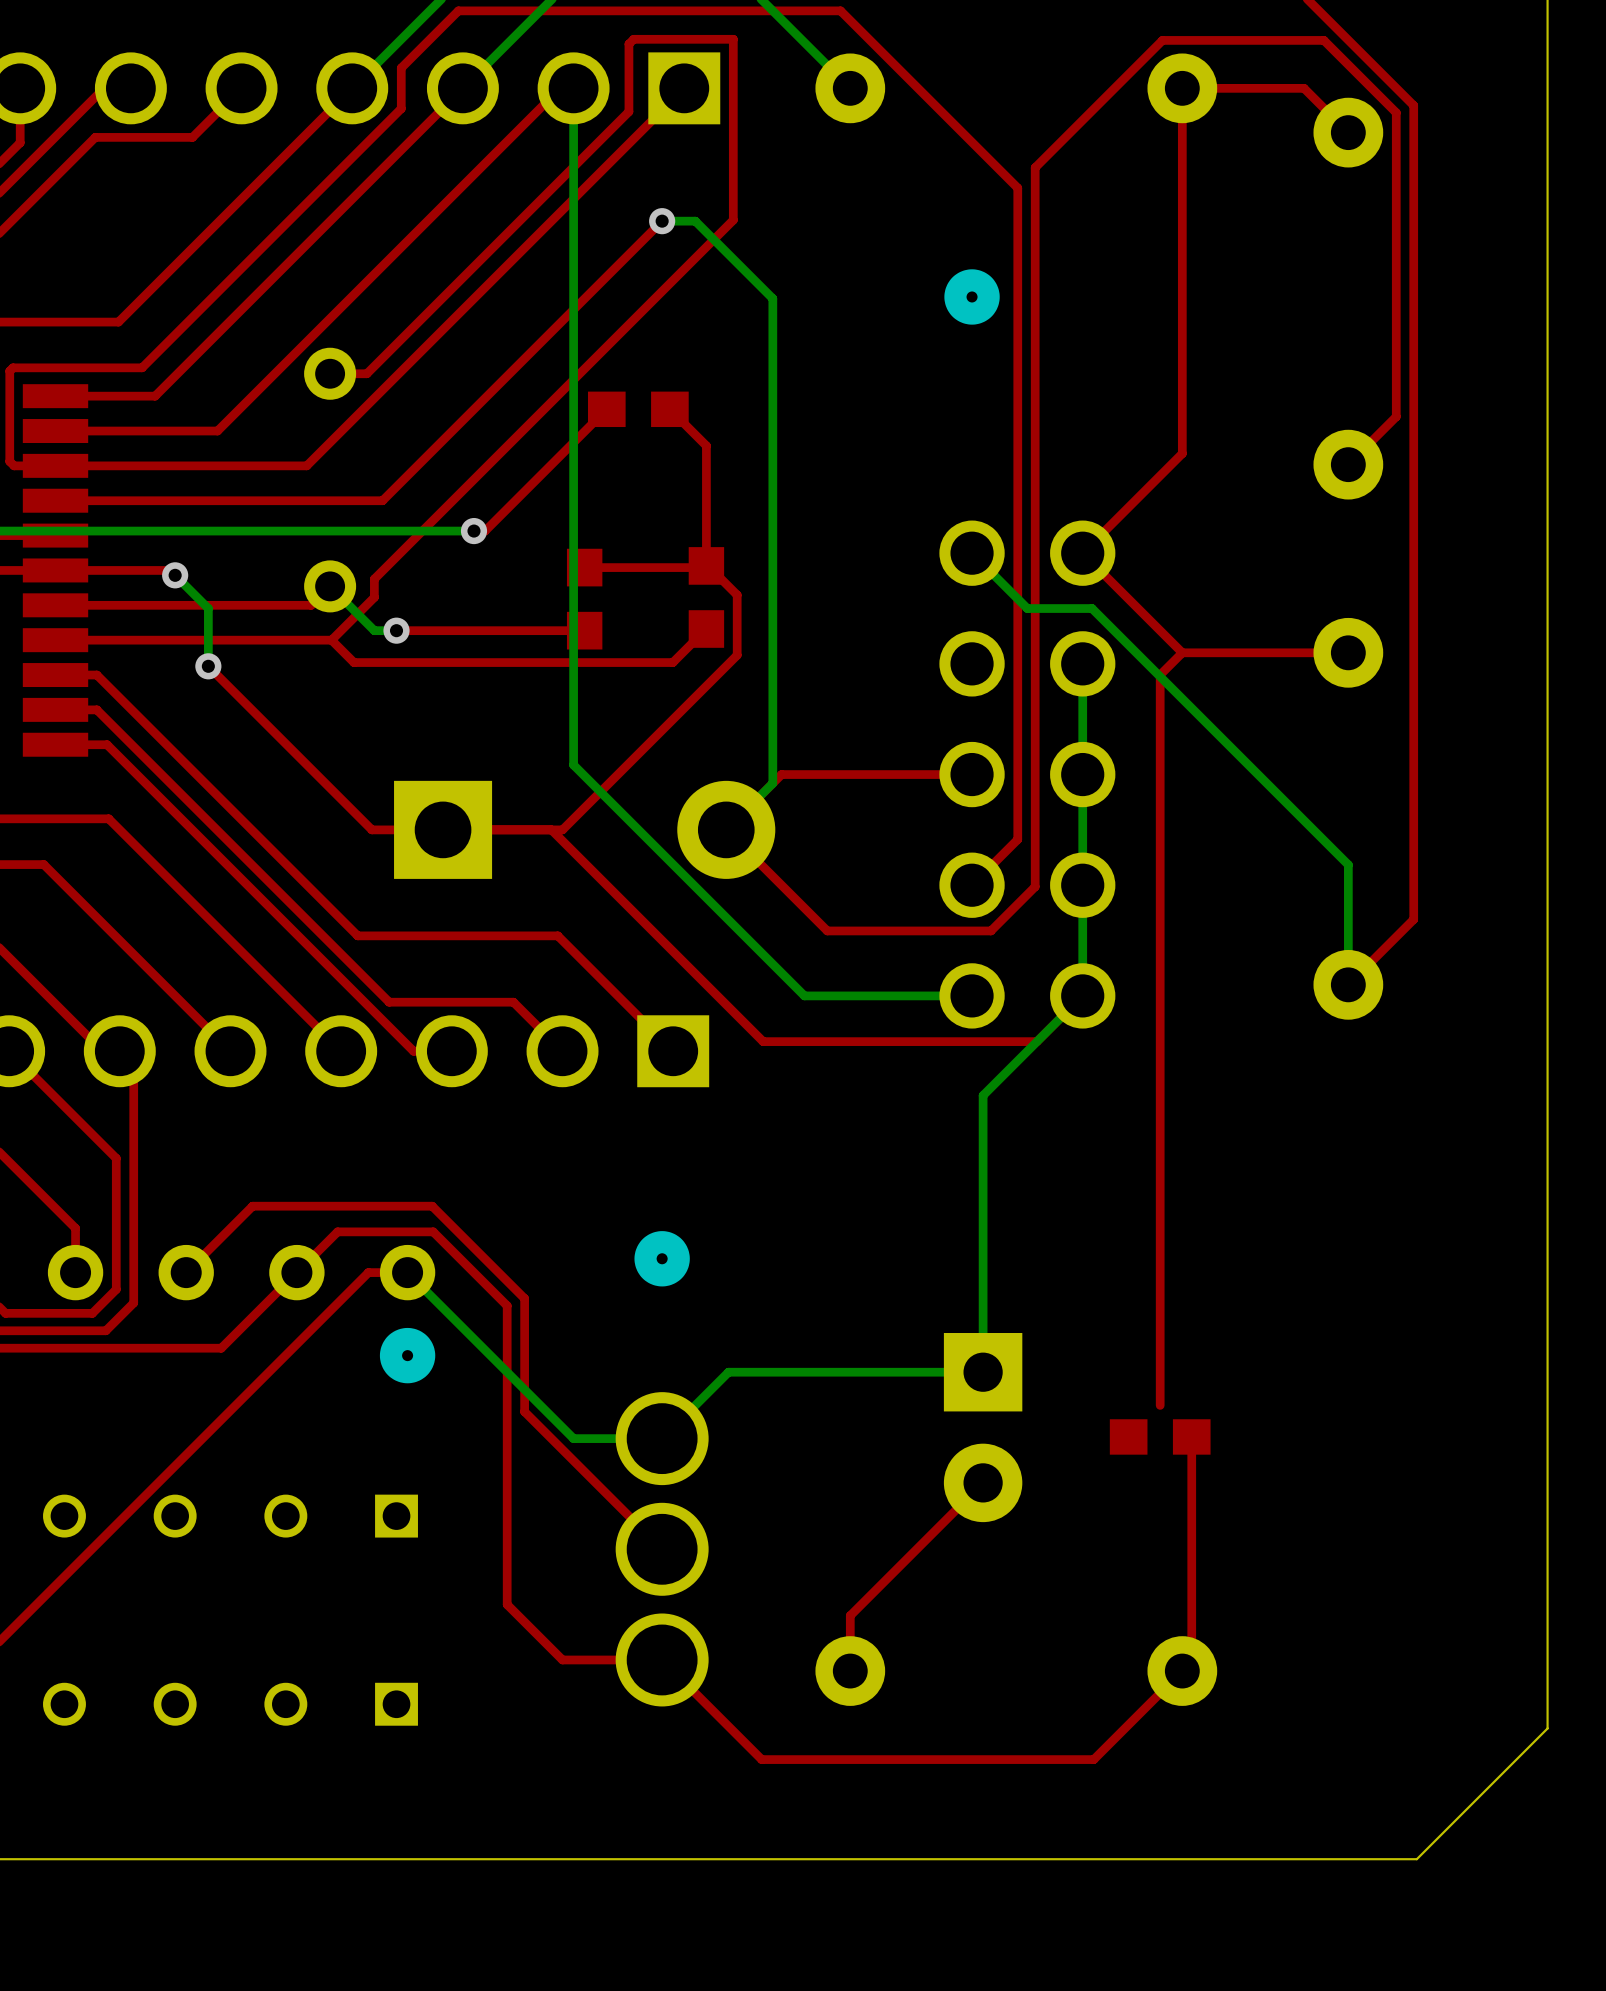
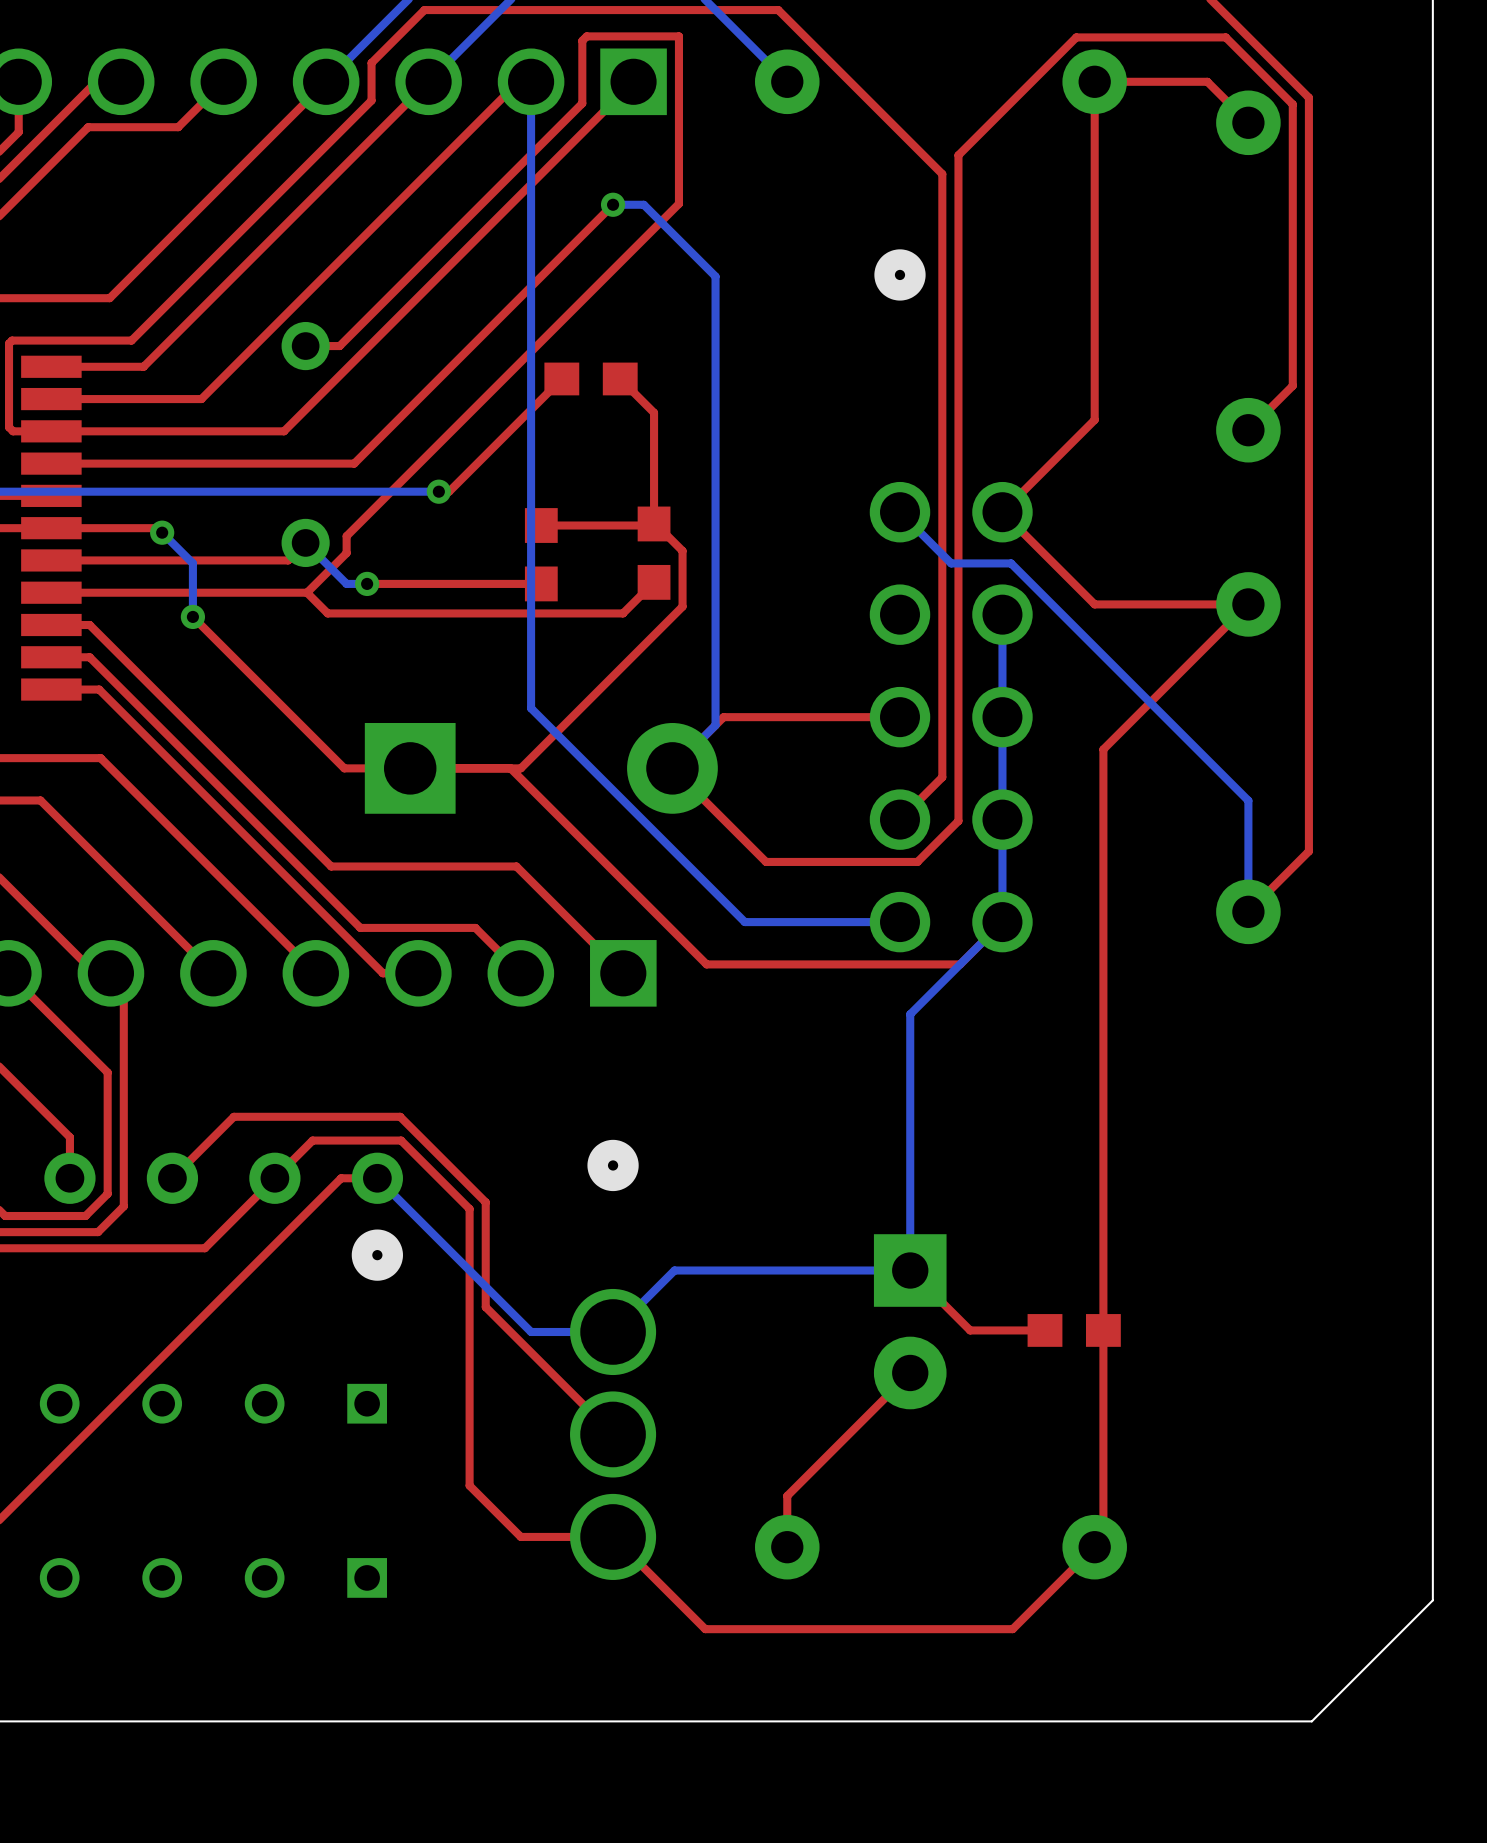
top track: (1182, 652) (1160, 674) (1160, 1405) -> none
top track: none -> (1248, 604) (1103, 749) (1103, 1330)
top track: none -> (910, 1270) (970, 1330) (1044, 1330)

